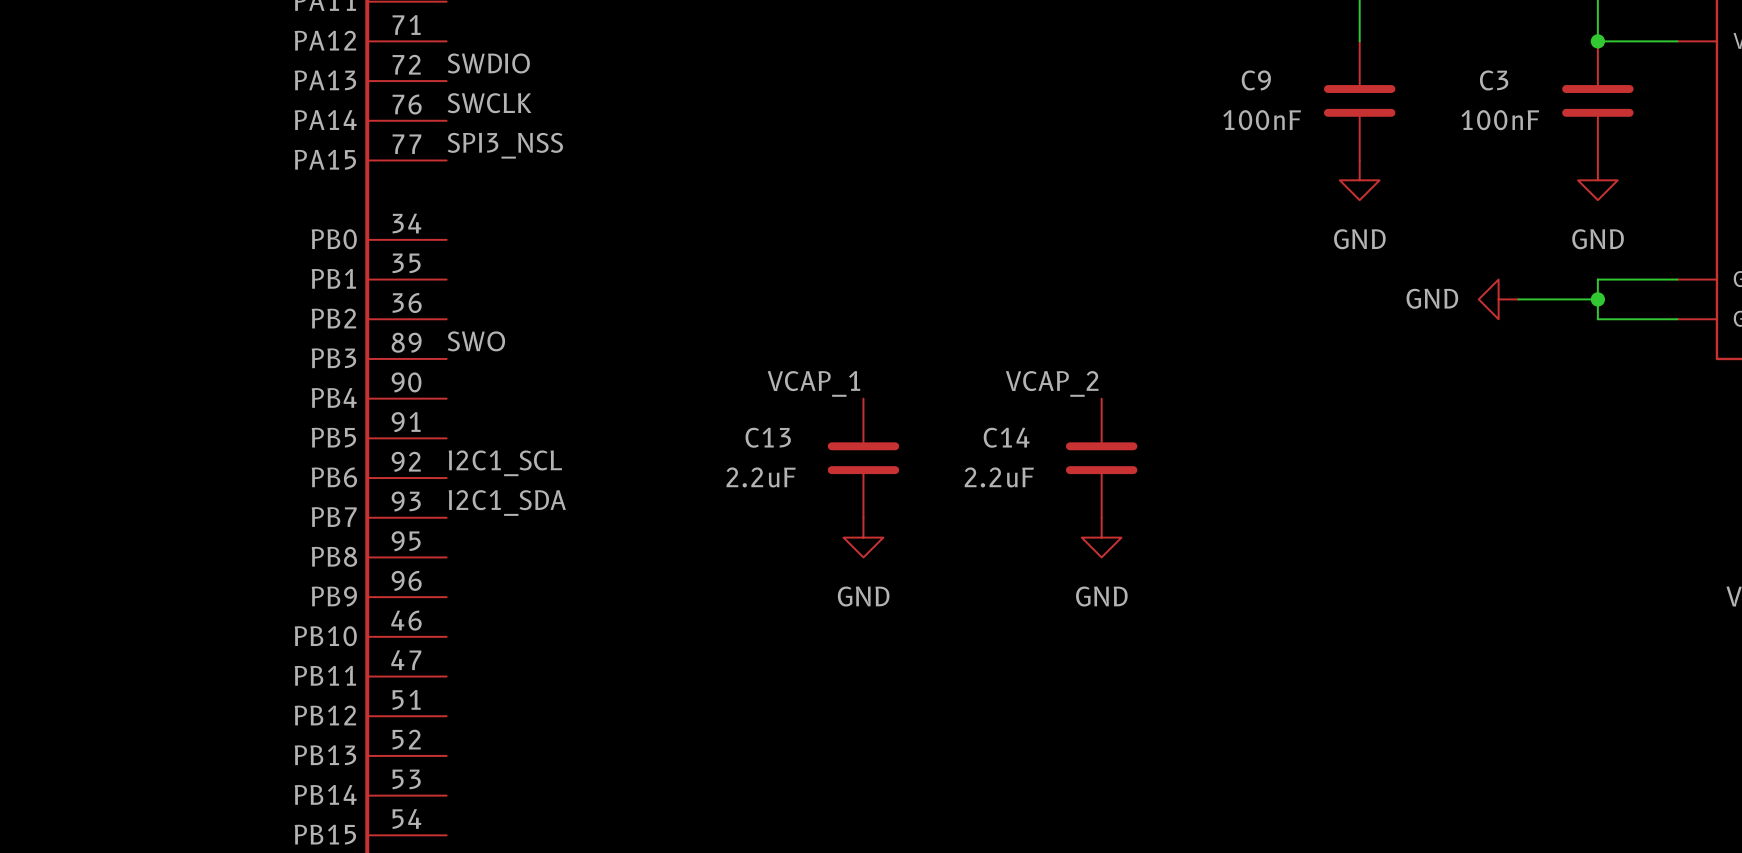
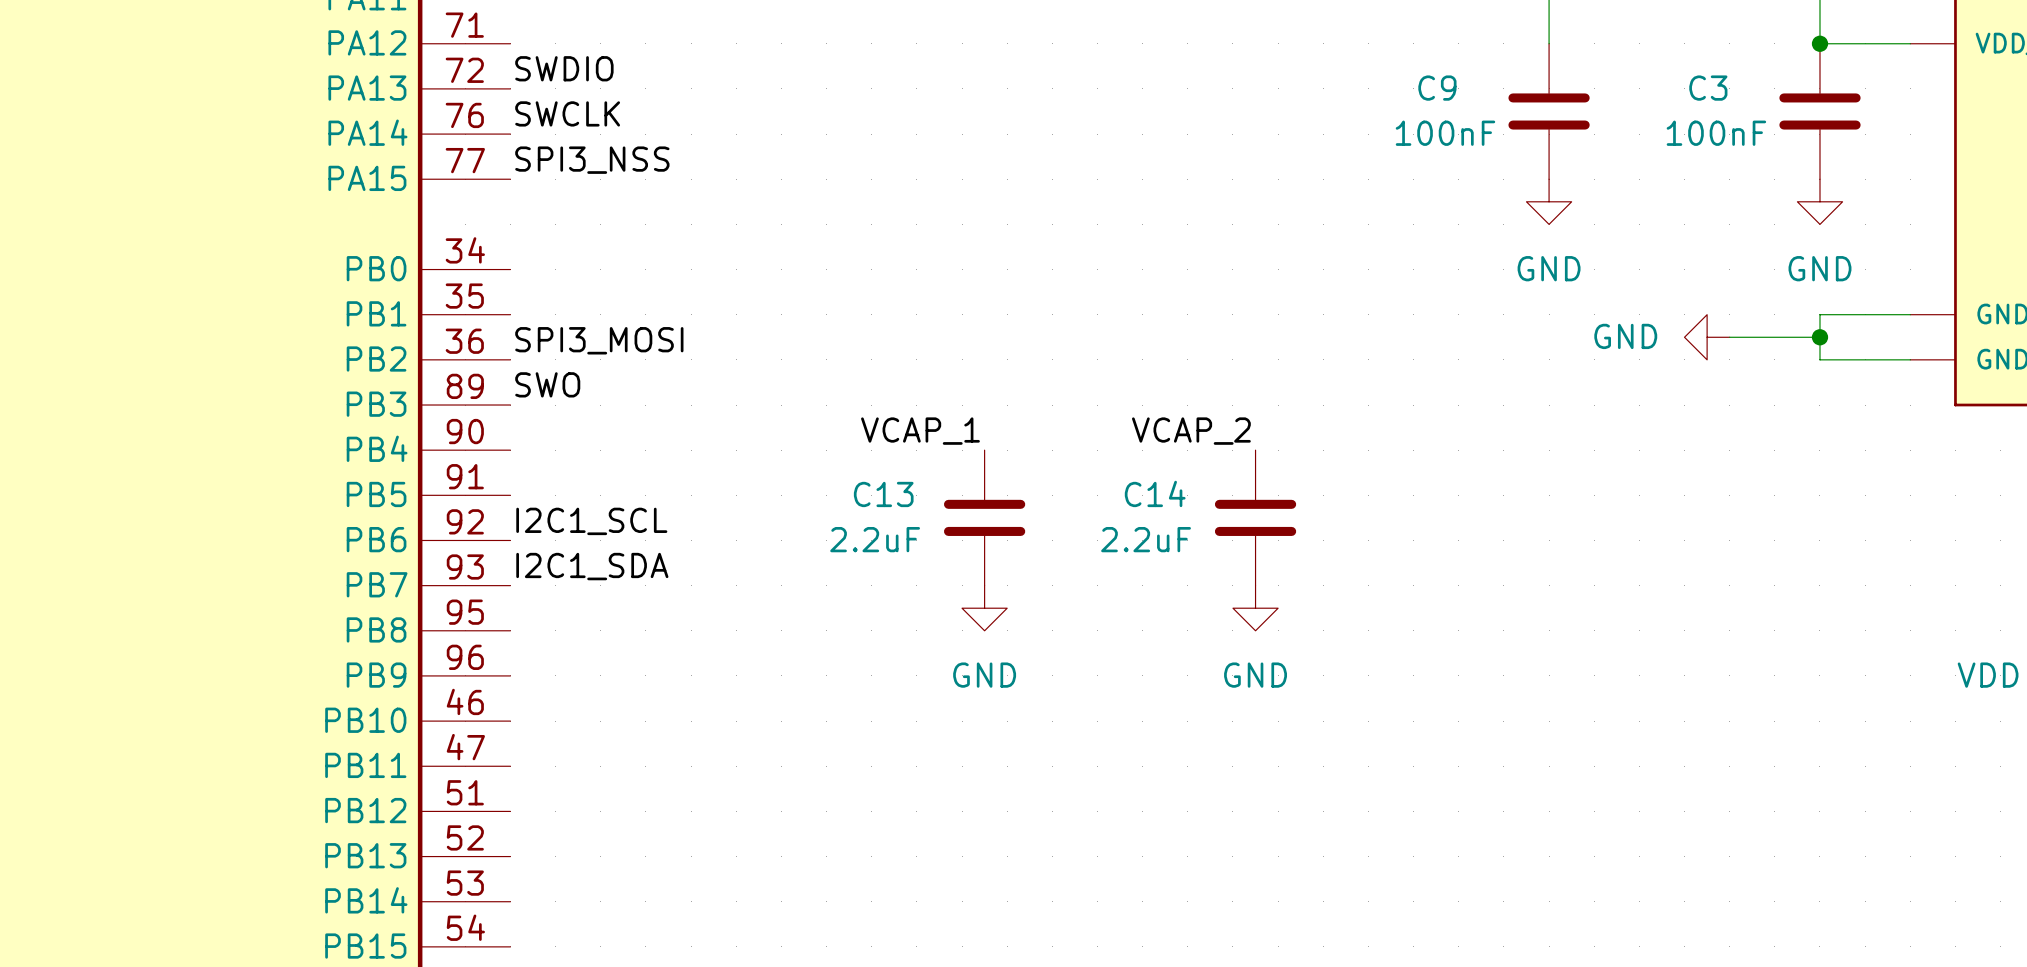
label: none -> SPI3_MOSI (599, 340)

